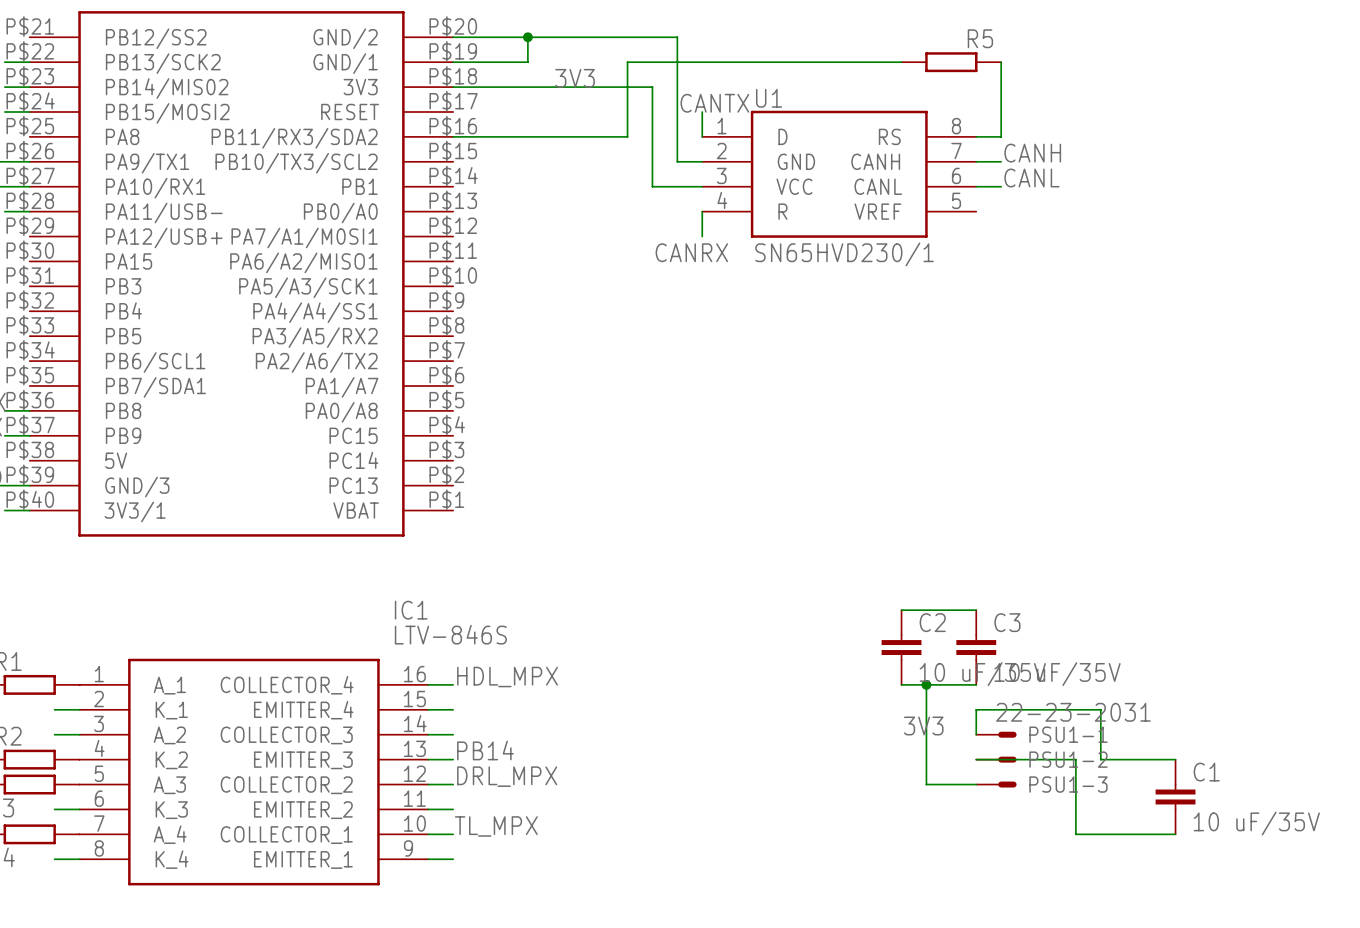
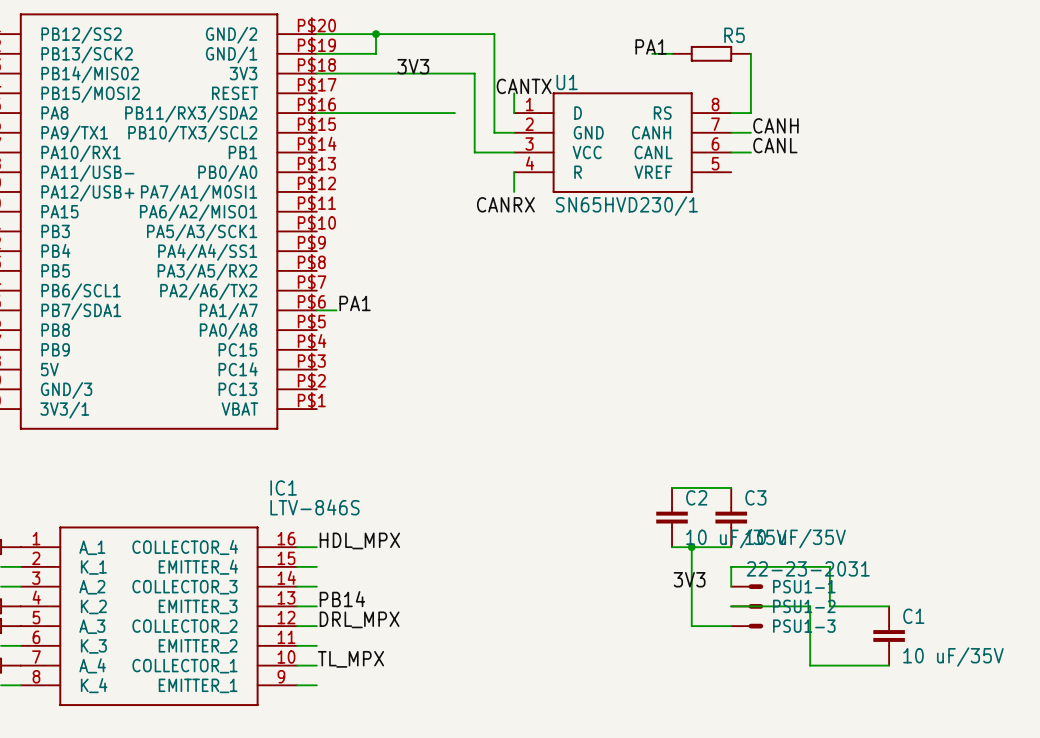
label: none -> PA1 (651, 46)
wire: (876, 62) (627, 62) (627, 136) -> none
label: none -> PA1 (355, 303)
wire: none -> (316, 310) (336, 310)

